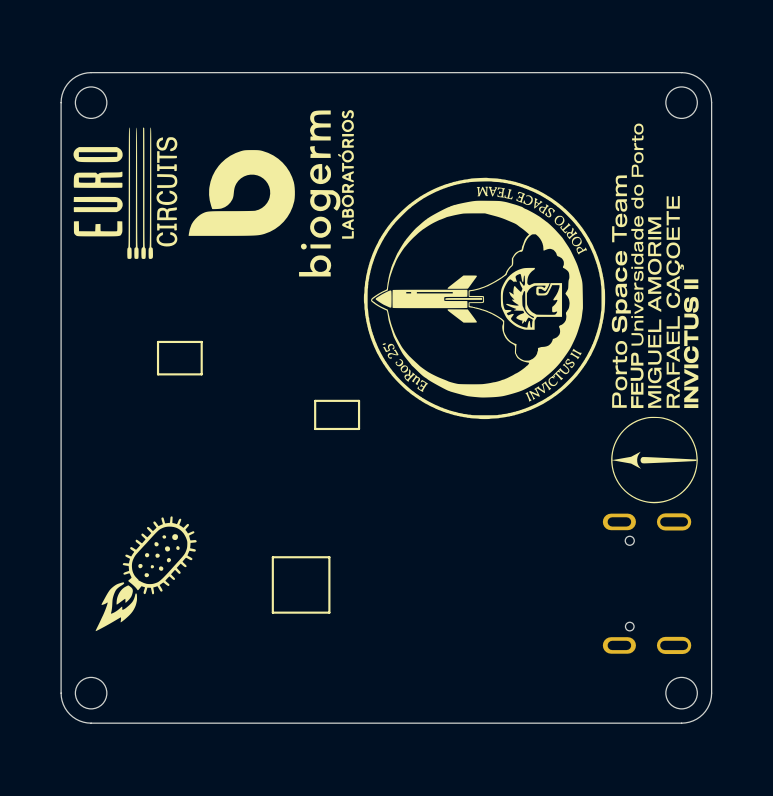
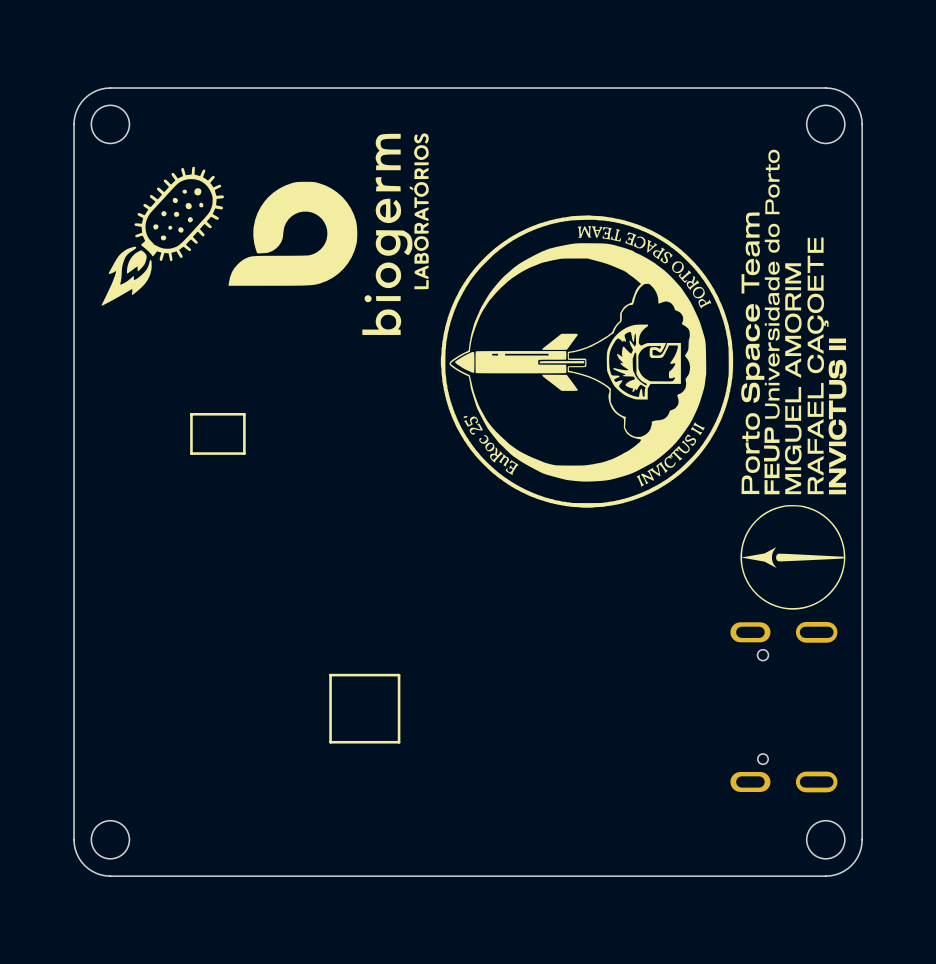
drawing shape: [73, 127, 178, 259] -> [101, 166, 224, 306]
line: (359, 400) (315, 400) (315, 428) (359, 428) (359, 400) -> none
drawing: [95, 516, 197, 632] -> none

